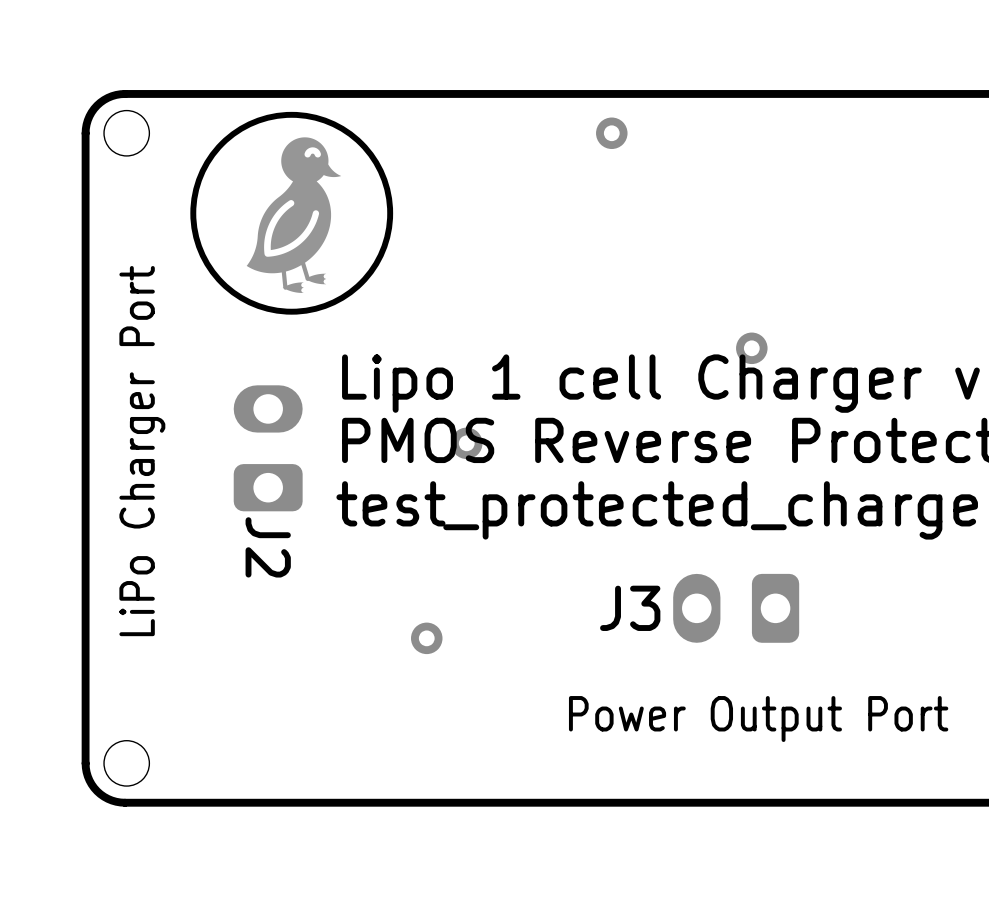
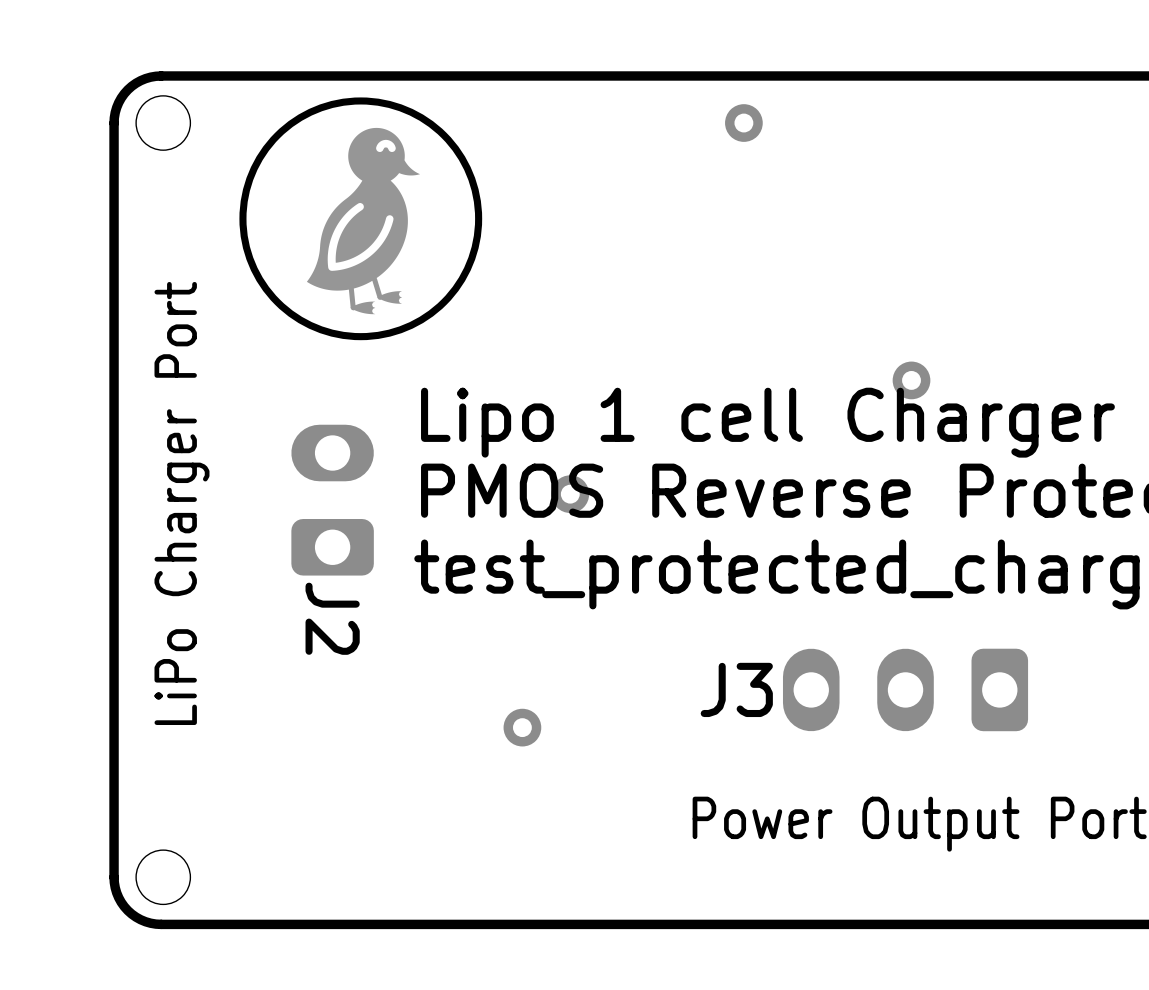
J3 footprint: [673, 573, 800, 643] -> [782, 648, 1029, 732]

